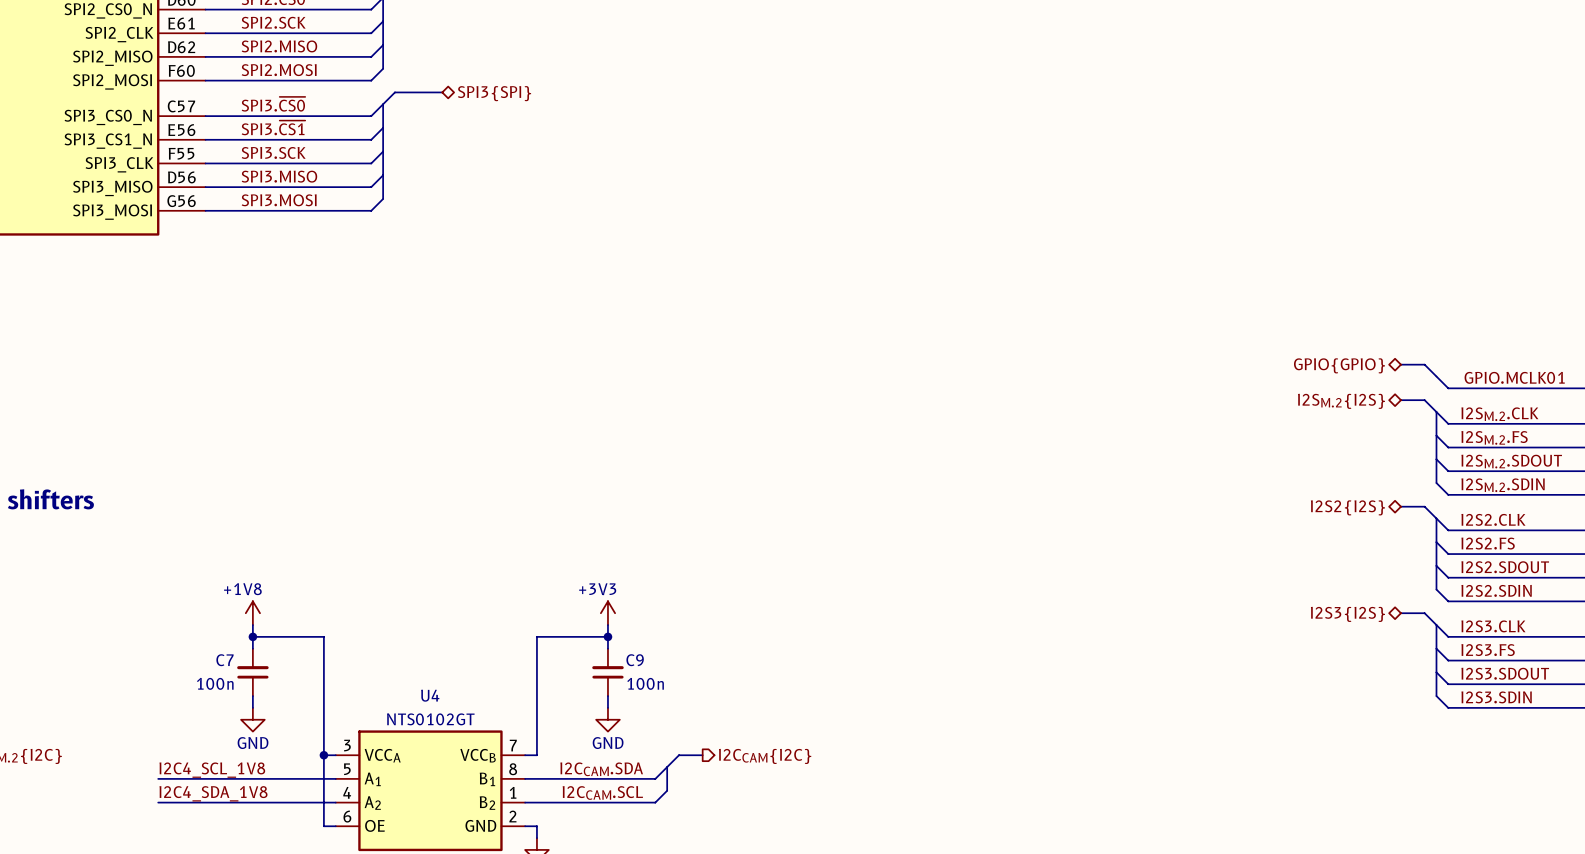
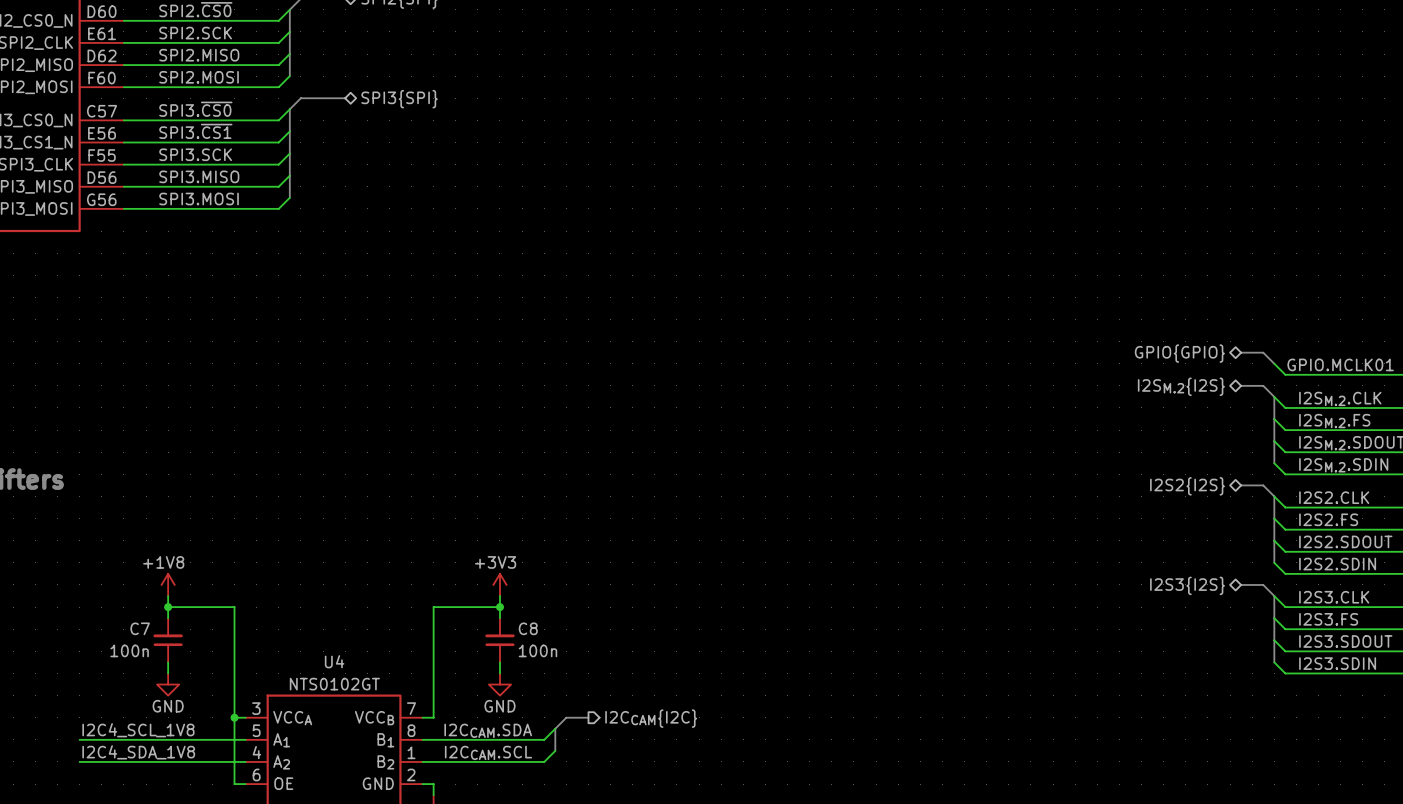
C9 name: C9 (635, 660) -> C8 (528, 628)

